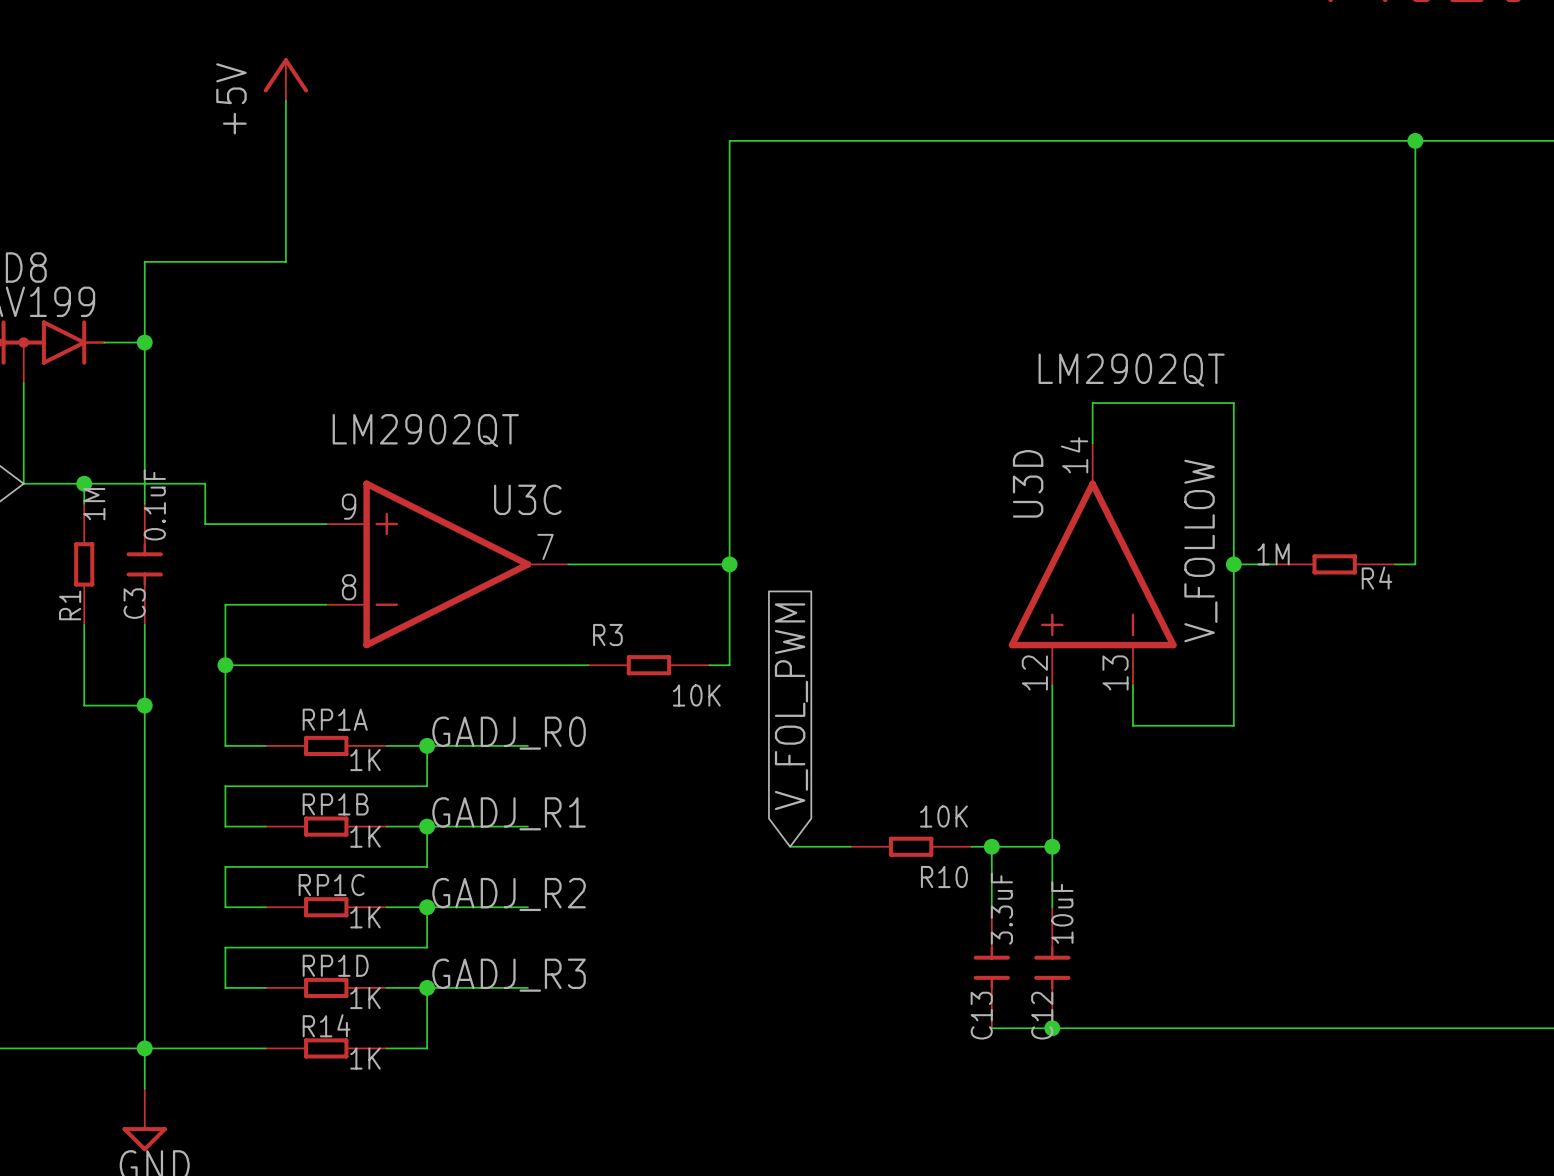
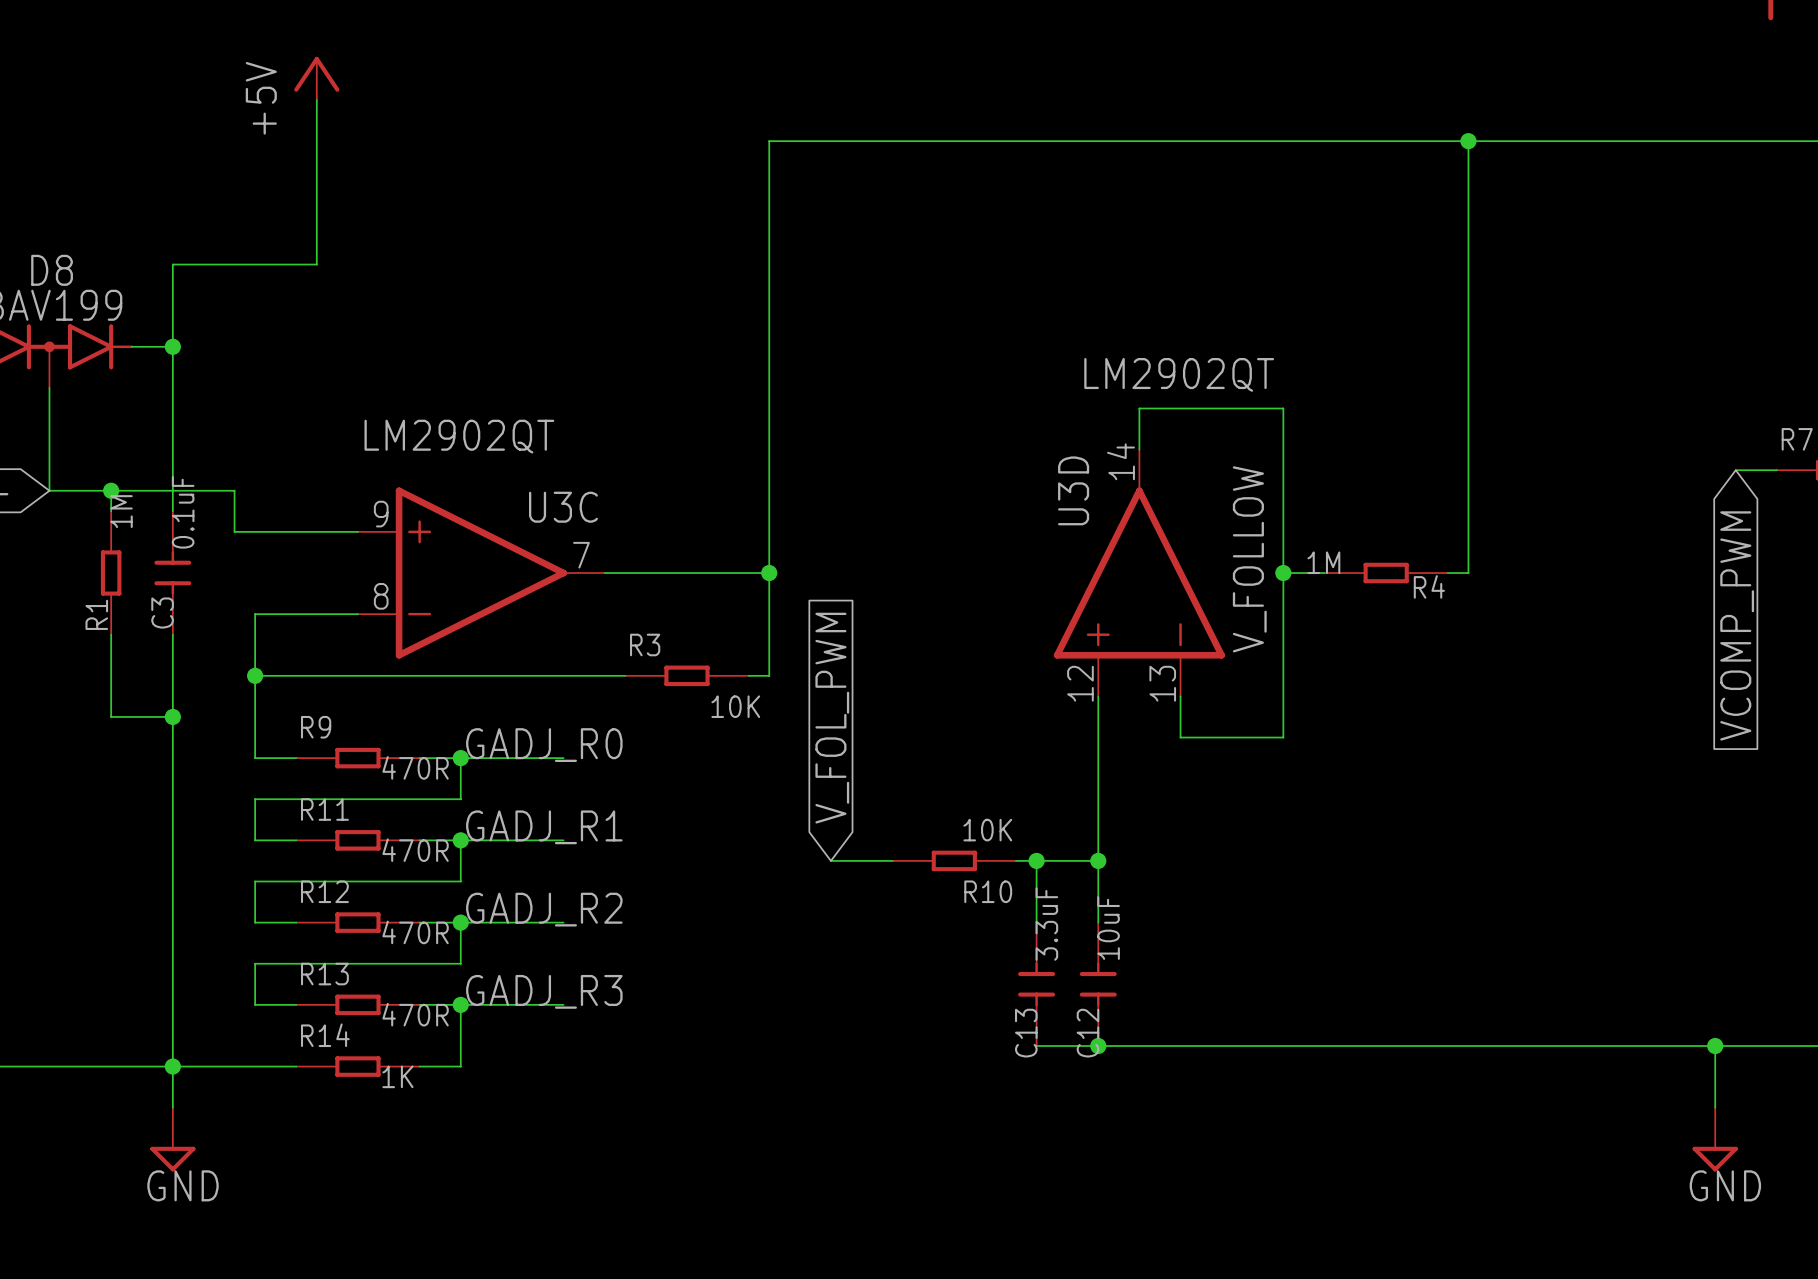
RP1A name: RP1A (335, 719) -> R9 (316, 727)
RP1A value: 1K (365, 760) -> 470R (415, 767)
RP1B name: RP1B (335, 804) -> R11 (324, 809)
RP1B value: 1K (365, 836) -> 470R (415, 850)
RP1C name: RP1C (331, 885) -> R12 (324, 891)
RP1C value: 1K (365, 917) -> 470R (415, 932)
RP1D name: RP1D (335, 965) -> R13 (324, 974)
RP1D value: 1K (365, 998) -> 470R (415, 1014)
R14 name position: R14 (326, 1025) -> R14 (325, 1035)

